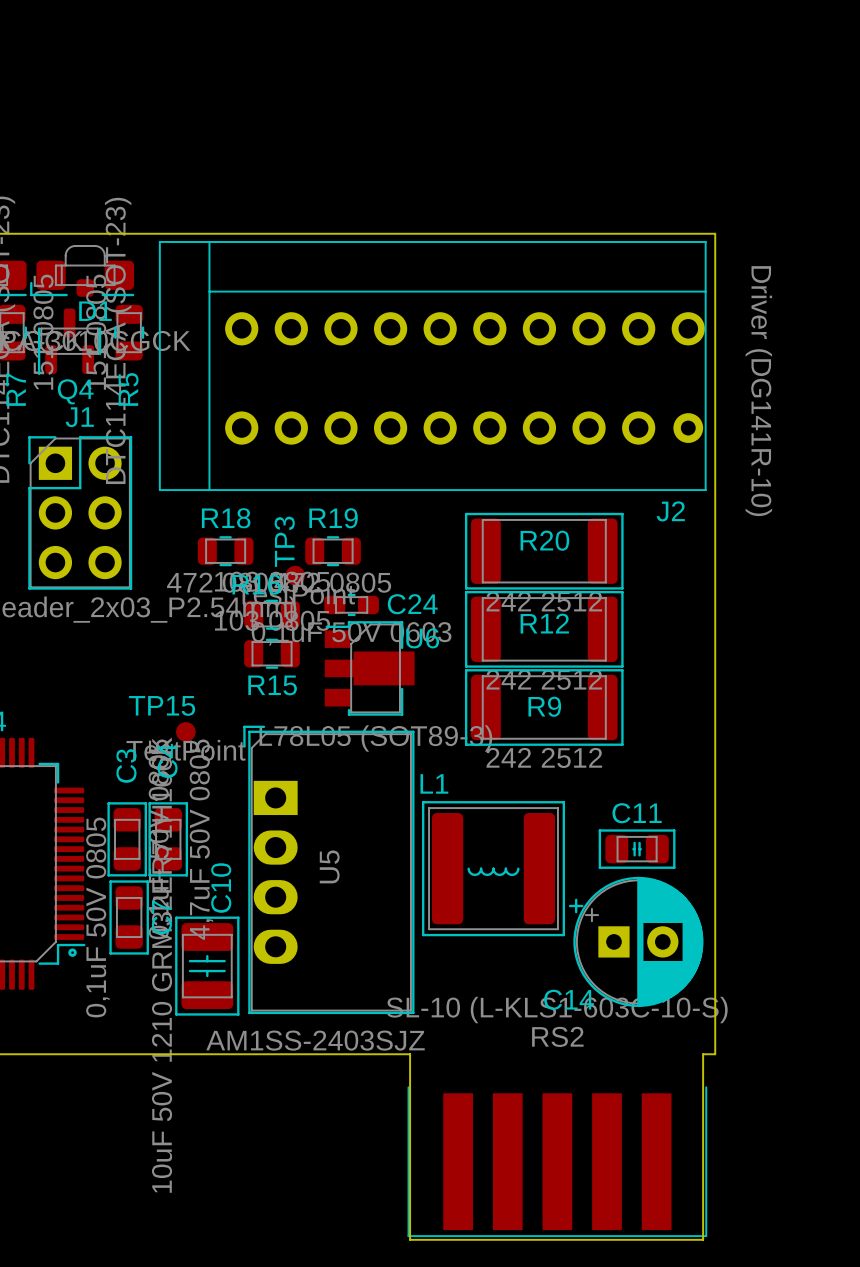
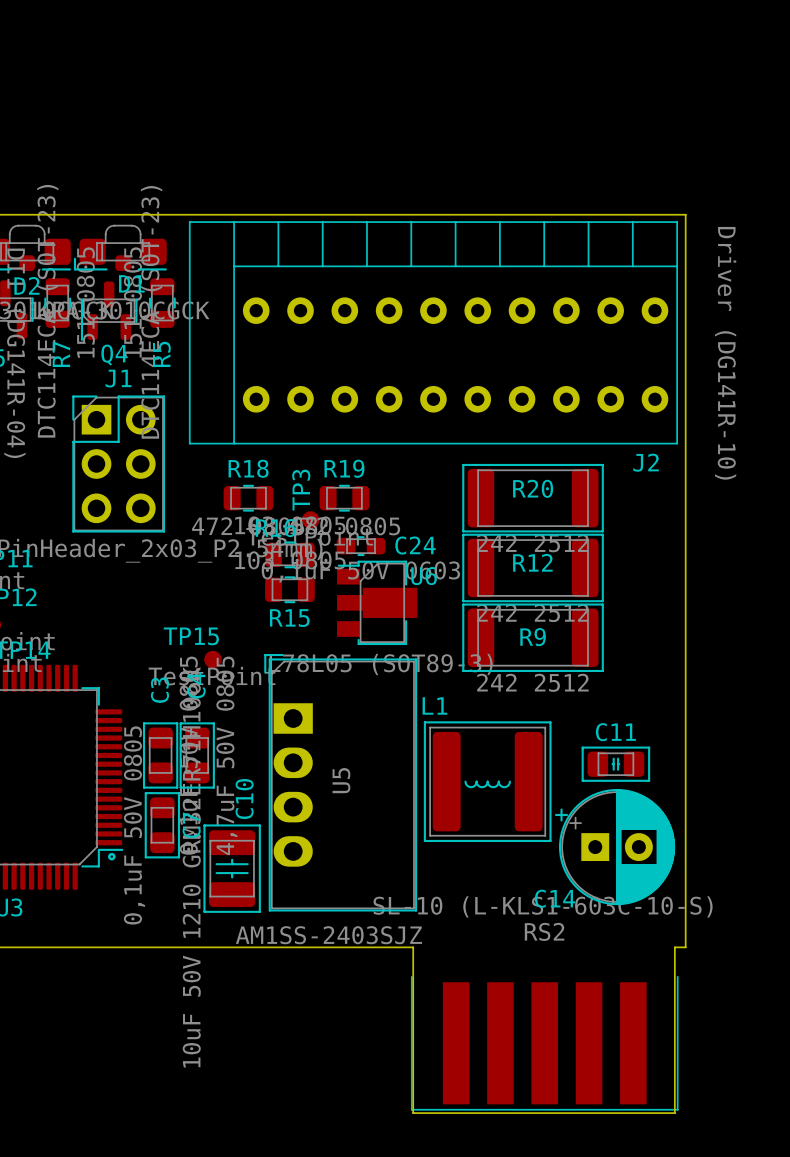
J2 footprint: [158, 241, 707, 492] -> [188, 221, 679, 445]

